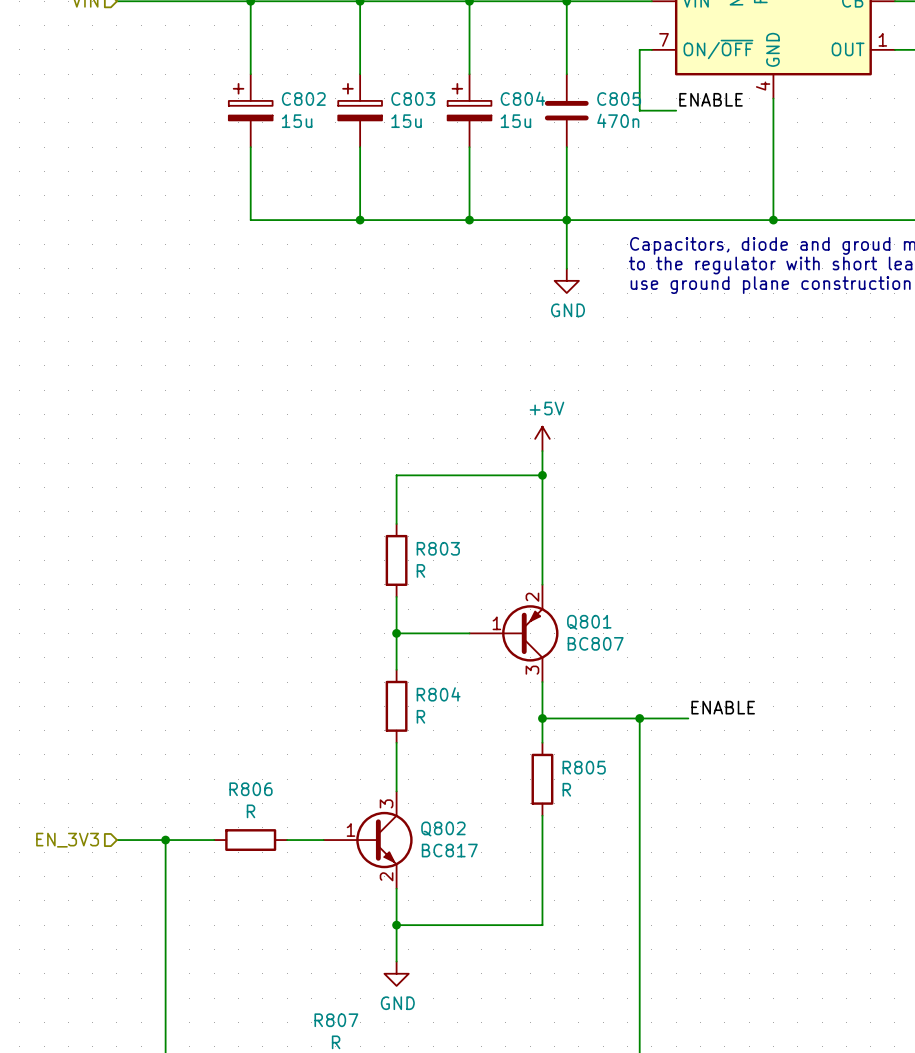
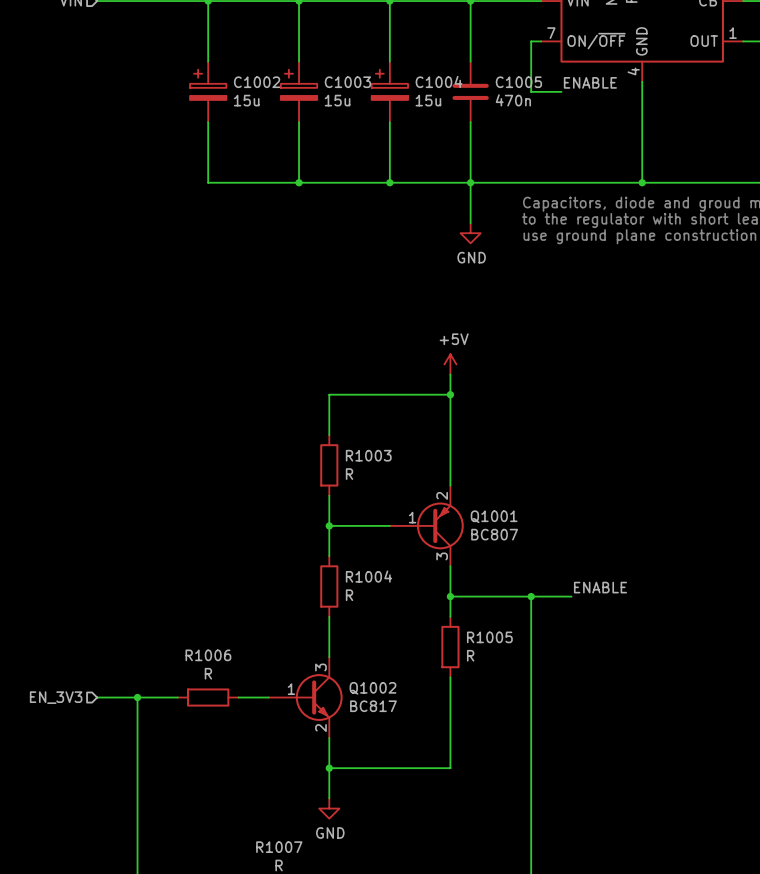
C804 name: C804 (522, 98) -> C1004 (439, 81)
C802 name: C802 (303, 99) -> C1002 (257, 82)
C803 name: C803 (413, 99) -> C1003 (347, 82)
C805 name: C805 (619, 99) -> C1005 (518, 82)
R803 name: R803 (438, 548) -> R1003 (368, 455)
Q801 name: Q801 (589, 622) -> Q1001 (494, 516)
R804 name: R804 (438, 694) -> R1004 (368, 576)
R805 name: R805 (584, 767) -> R1005 (489, 637)
R806 name: R806 (251, 789) -> R1006 (208, 655)
Q802 name: Q802 (443, 828) -> Q1002 (372, 688)
R807 name: R807 (336, 1020) -> R1007 (279, 847)

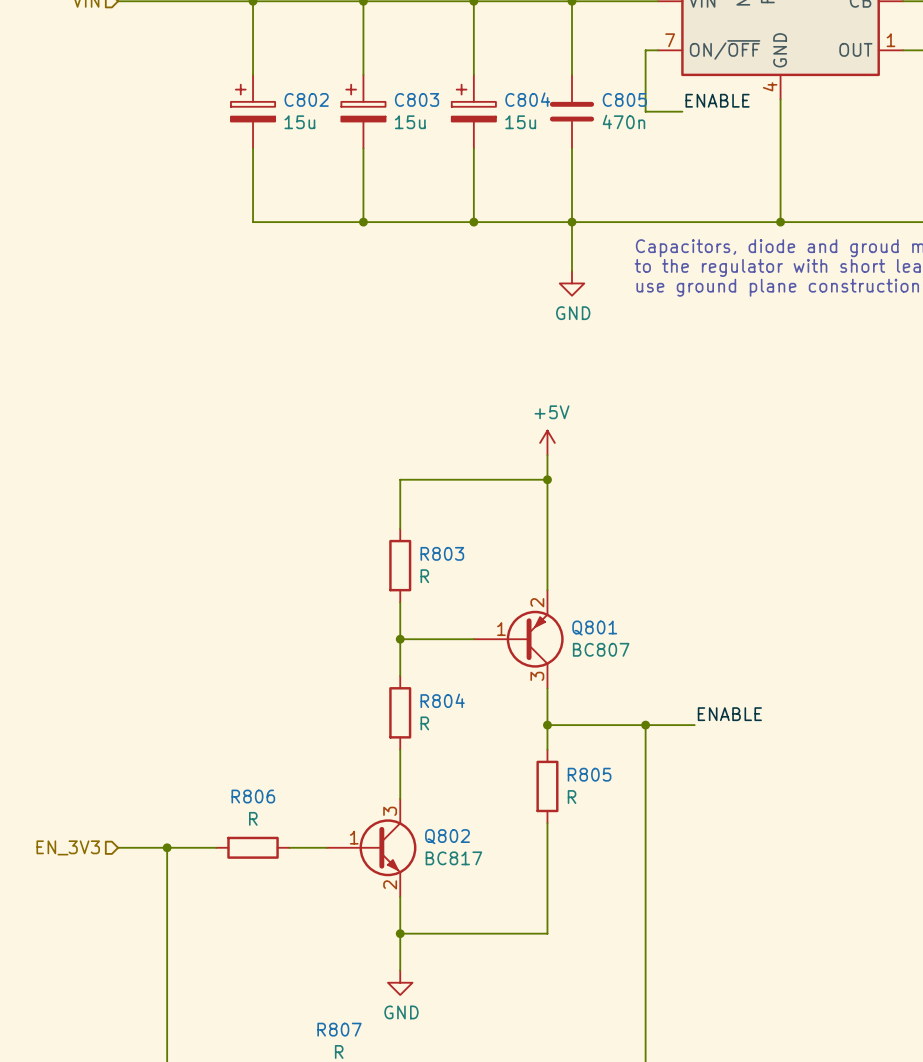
C1004 name: C1004 (439, 81) -> C804 (527, 99)
C1002 name: C1002 (257, 82) -> C802 (306, 99)
C1003 name: C1003 (347, 82) -> C803 (417, 99)
C1005 name: C1005 (518, 82) -> C805 (624, 99)
R1003 name: R1003 (368, 455) -> R803 (442, 553)
Q1001 name: Q1001 (494, 516) -> Q801 (594, 628)
R1004 name: R1004 (368, 576) -> R804 (442, 700)
R1005 name: R1005 (489, 637) -> R805 (589, 774)
R1006 name: R1006 (208, 655) -> R806 (253, 796)
Q1002 name: Q1002 (372, 688) -> Q802 (447, 836)
R1007 name: R1007 (279, 847) -> R807 (339, 1029)

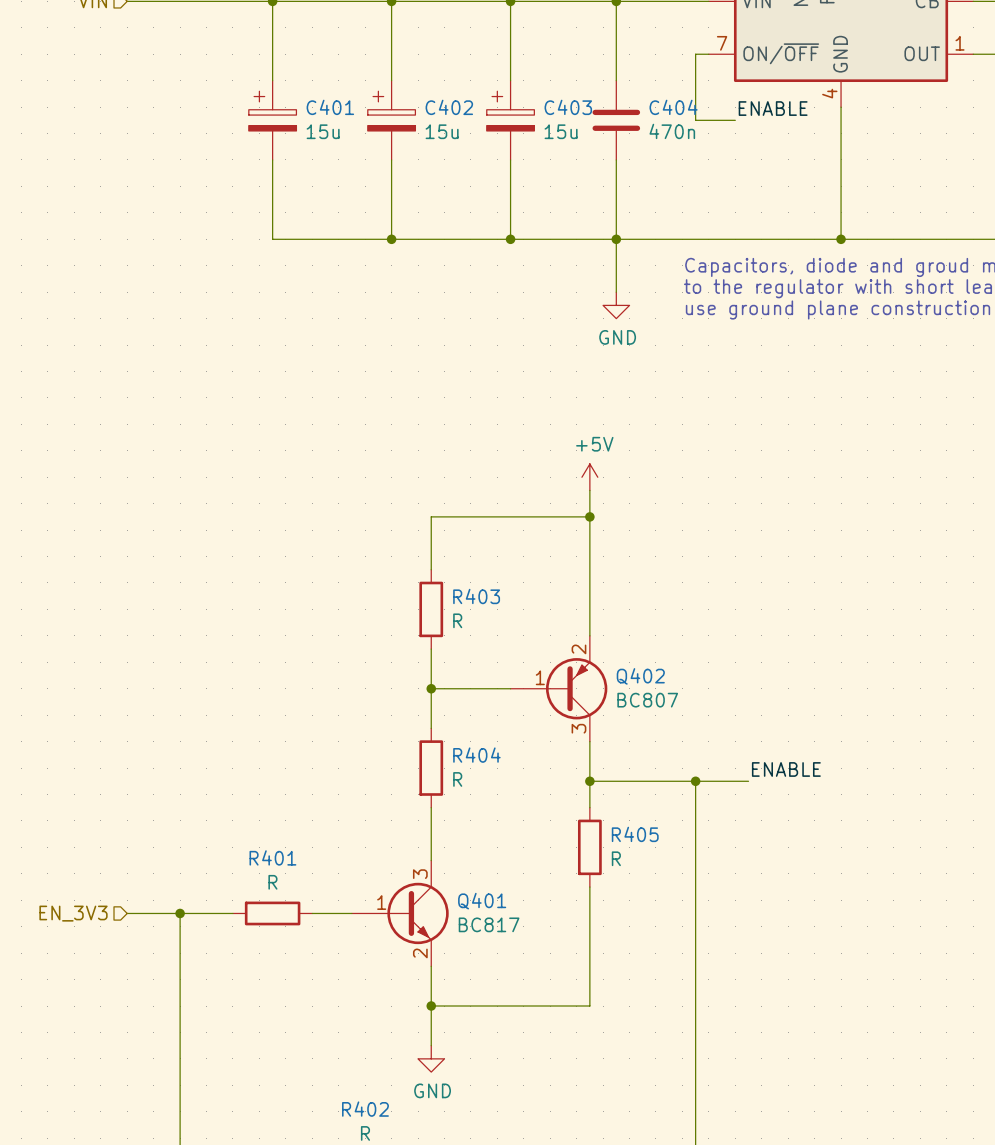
C802 name: C802 (306, 99) -> C401 (330, 107)
C803 name: C803 (417, 99) -> C402 (449, 107)
C804 name: C804 (527, 99) -> C403 (568, 107)
C805 name: C805 (624, 99) -> C404 (673, 107)
R803 name: R803 (442, 553) -> R403 (476, 596)
Q801 name: Q801 (594, 628) -> Q402 (640, 676)
R804 name: R804 (442, 700) -> R404 (476, 755)
R805 name: R805 (589, 774) -> R405 (635, 834)
R806 name: R806 (253, 796) -> R401 (272, 857)
Q802 name: Q802 (447, 836) -> Q401 (482, 901)
R807 name: R807 (339, 1029) -> R402 (365, 1109)

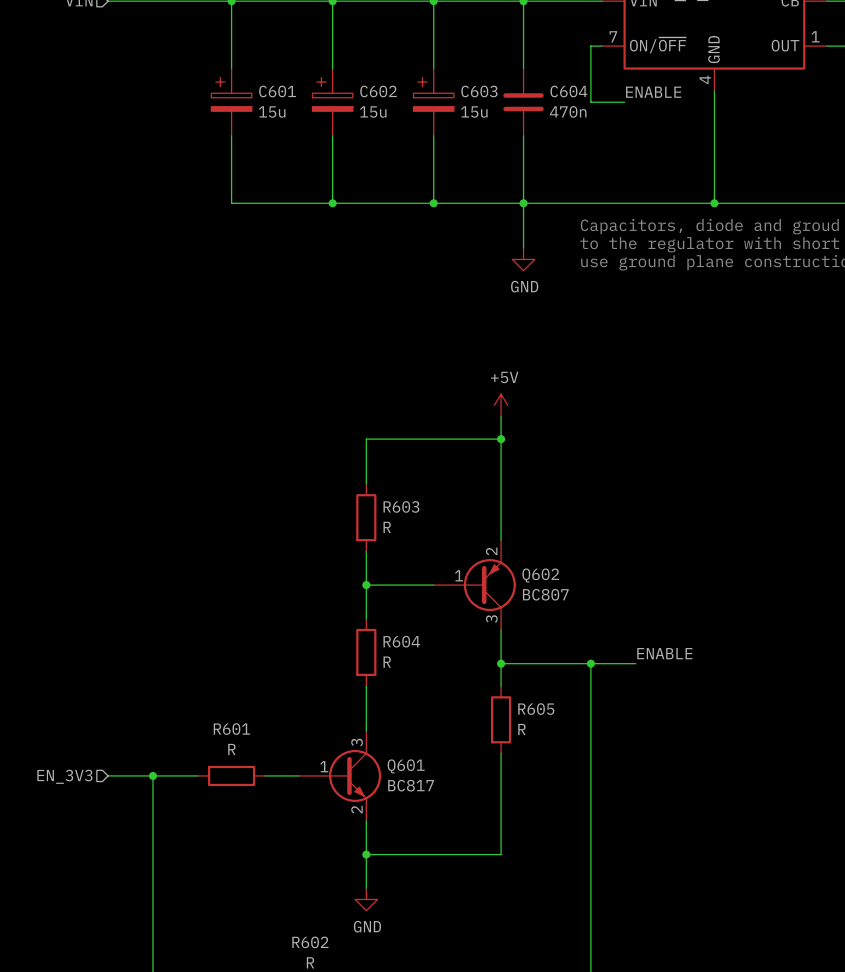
C401 name: C401 (330, 107) -> C601 (277, 91)
C402 name: C402 (449, 107) -> C602 (378, 91)
C403 name: C403 (568, 107) -> C603 (479, 91)
C404 name: C404 (673, 107) -> C604 (568, 91)
R403 name: R403 (476, 596) -> R603 (401, 506)
Q402 name: Q402 (640, 676) -> Q602 (540, 575)
R404 name: R404 (476, 755) -> R604 (401, 641)
R405 name: R405 (635, 834) -> R605 (536, 709)
R401 name: R401 (272, 857) -> R601 (231, 729)
Q401 name: Q401 (482, 901) -> Q601 (406, 766)
R402 name: R402 (365, 1109) -> R602 (310, 942)

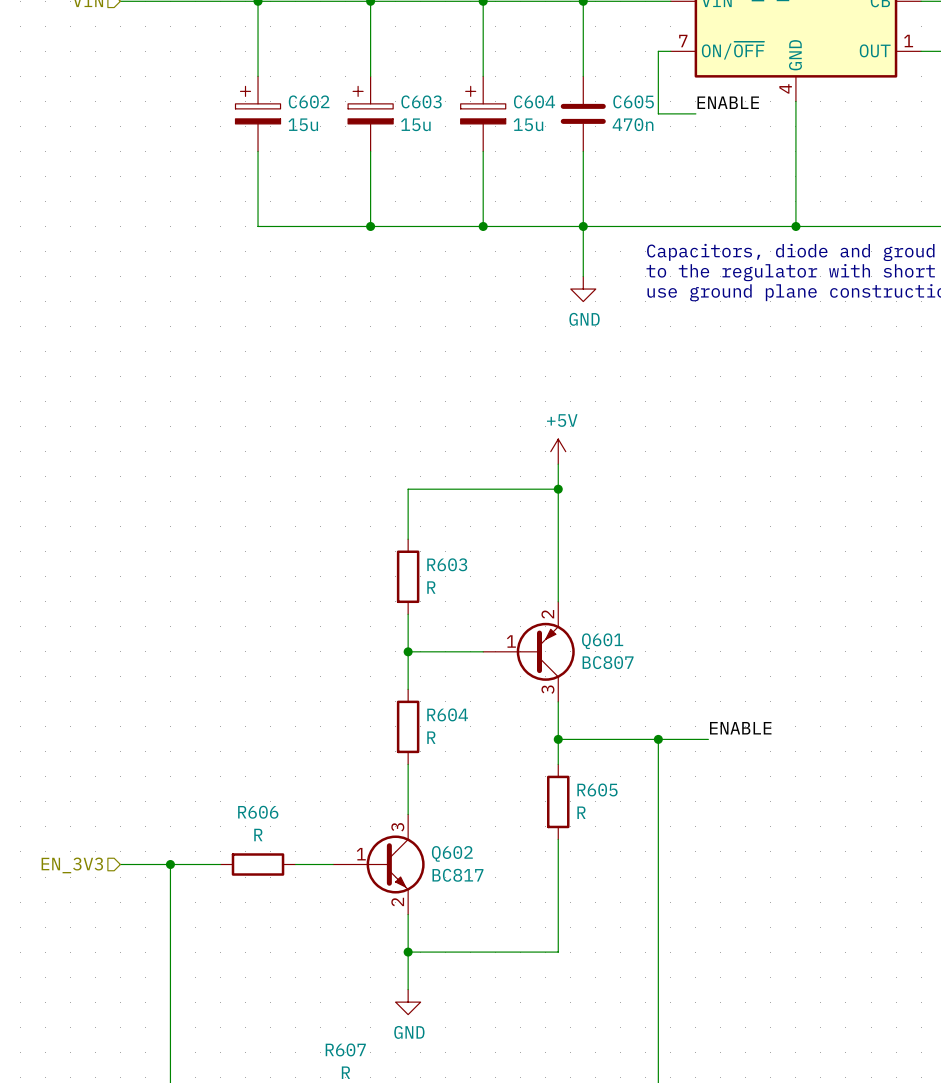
C601 name: C601 (277, 91) -> C602 (309, 101)
C602 name: C602 (378, 91) -> C603 (421, 101)
C603 name: C603 (479, 91) -> C604 (534, 101)
C604 name: C604 (568, 91) -> C605 (633, 101)
Q602 name: Q602 (540, 575) -> Q601 (602, 641)
R601 name: R601 (231, 729) -> R606 (258, 812)
Q601 name: Q601 (406, 766) -> Q602 (452, 853)
R602 name: R602 (310, 942) -> R607 (345, 1049)

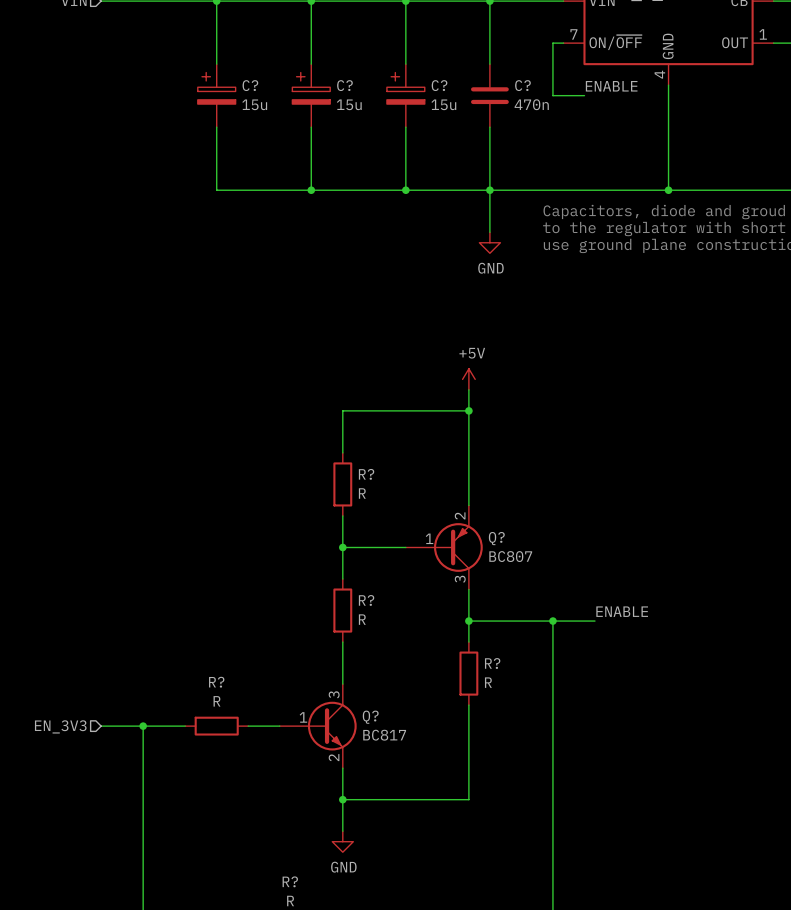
C602 name: C602 (309, 101) -> C? (250, 85)
C603 name: C603 (421, 101) -> C? (344, 85)
C604 name: C604 (534, 101) -> C? (439, 85)
C605 name: C605 (633, 101) -> C? (522, 85)
R603 name: R603 (447, 564) -> R? (366, 474)
Q601 name: Q601 (602, 641) -> Q? (496, 538)
R604 name: R604 (447, 714) -> R? (366, 600)
R605 name: R605 (597, 789) -> R? (492, 663)
R606 name: R606 (258, 812) -> R? (216, 682)
Q602 name: Q602 (452, 853) -> Q? (370, 717)
R607 name: R607 (345, 1049) -> R? (290, 881)

